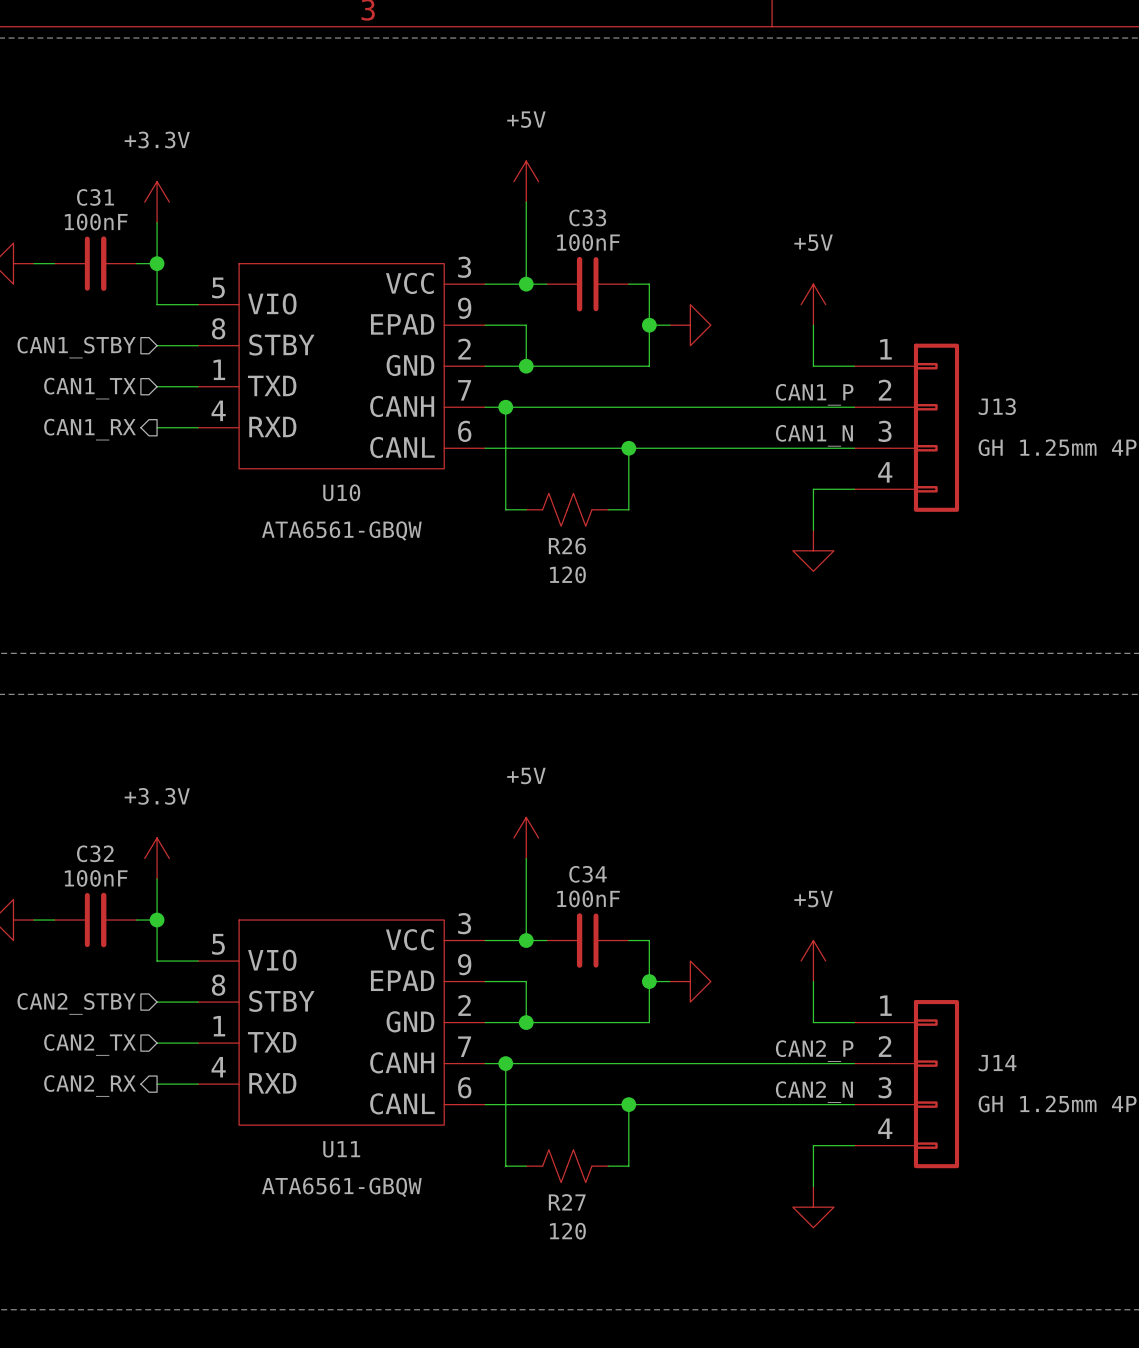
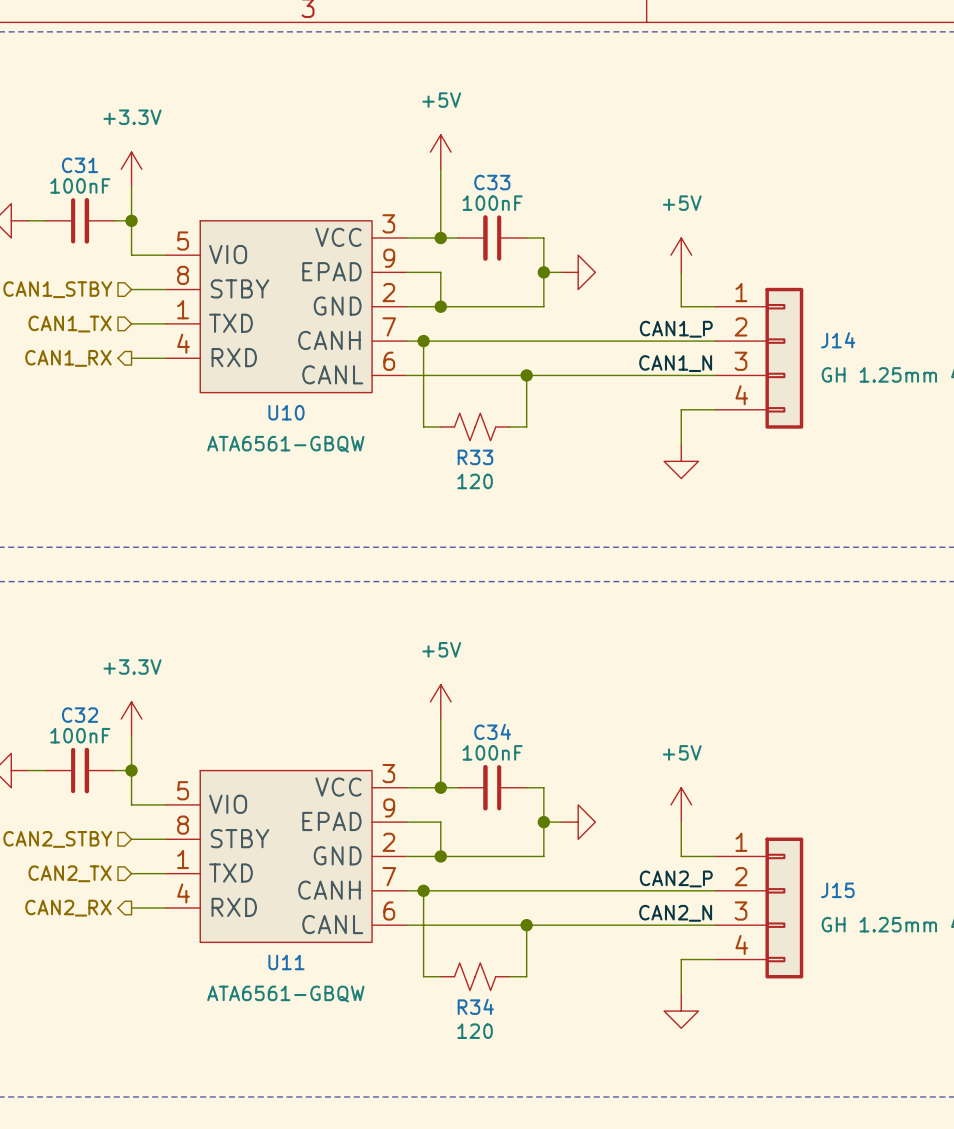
J13 name: J13 (997, 406) -> J14 (838, 340)
R26 name: R26 (567, 546) -> R33 (475, 457)
J14 name: J14 (997, 1063) -> J15 (837, 890)
R27 name: R27 (567, 1202) -> R34 (475, 1006)

